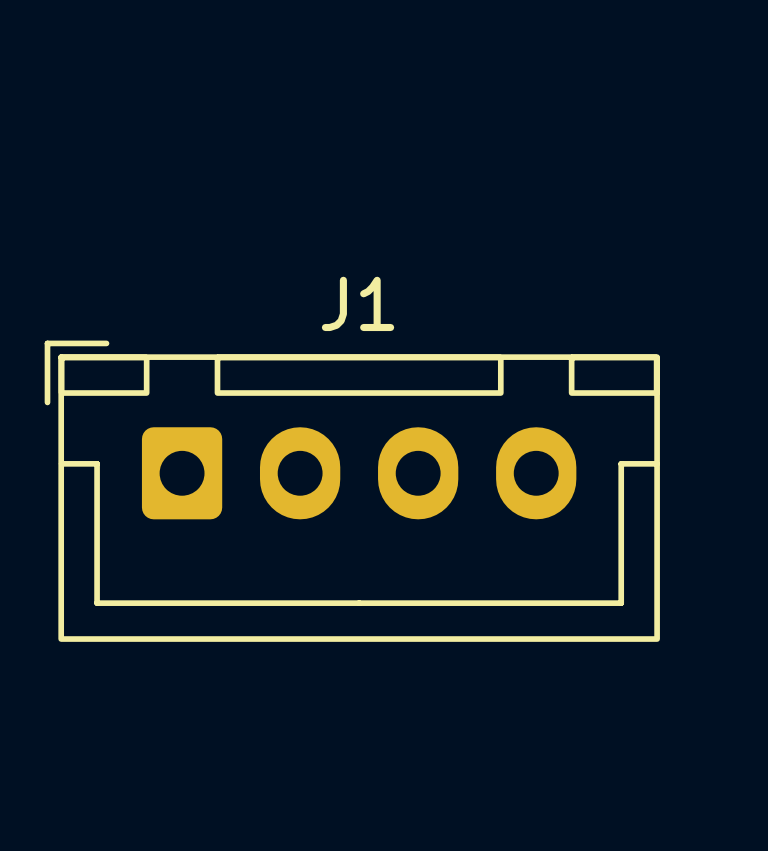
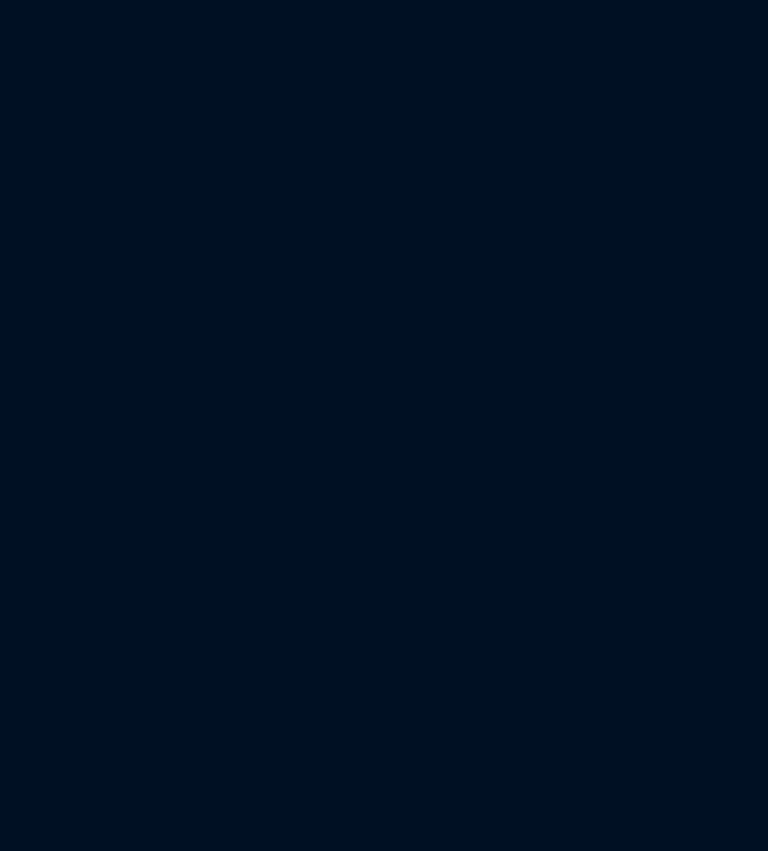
J1: (352, 491) -> none

